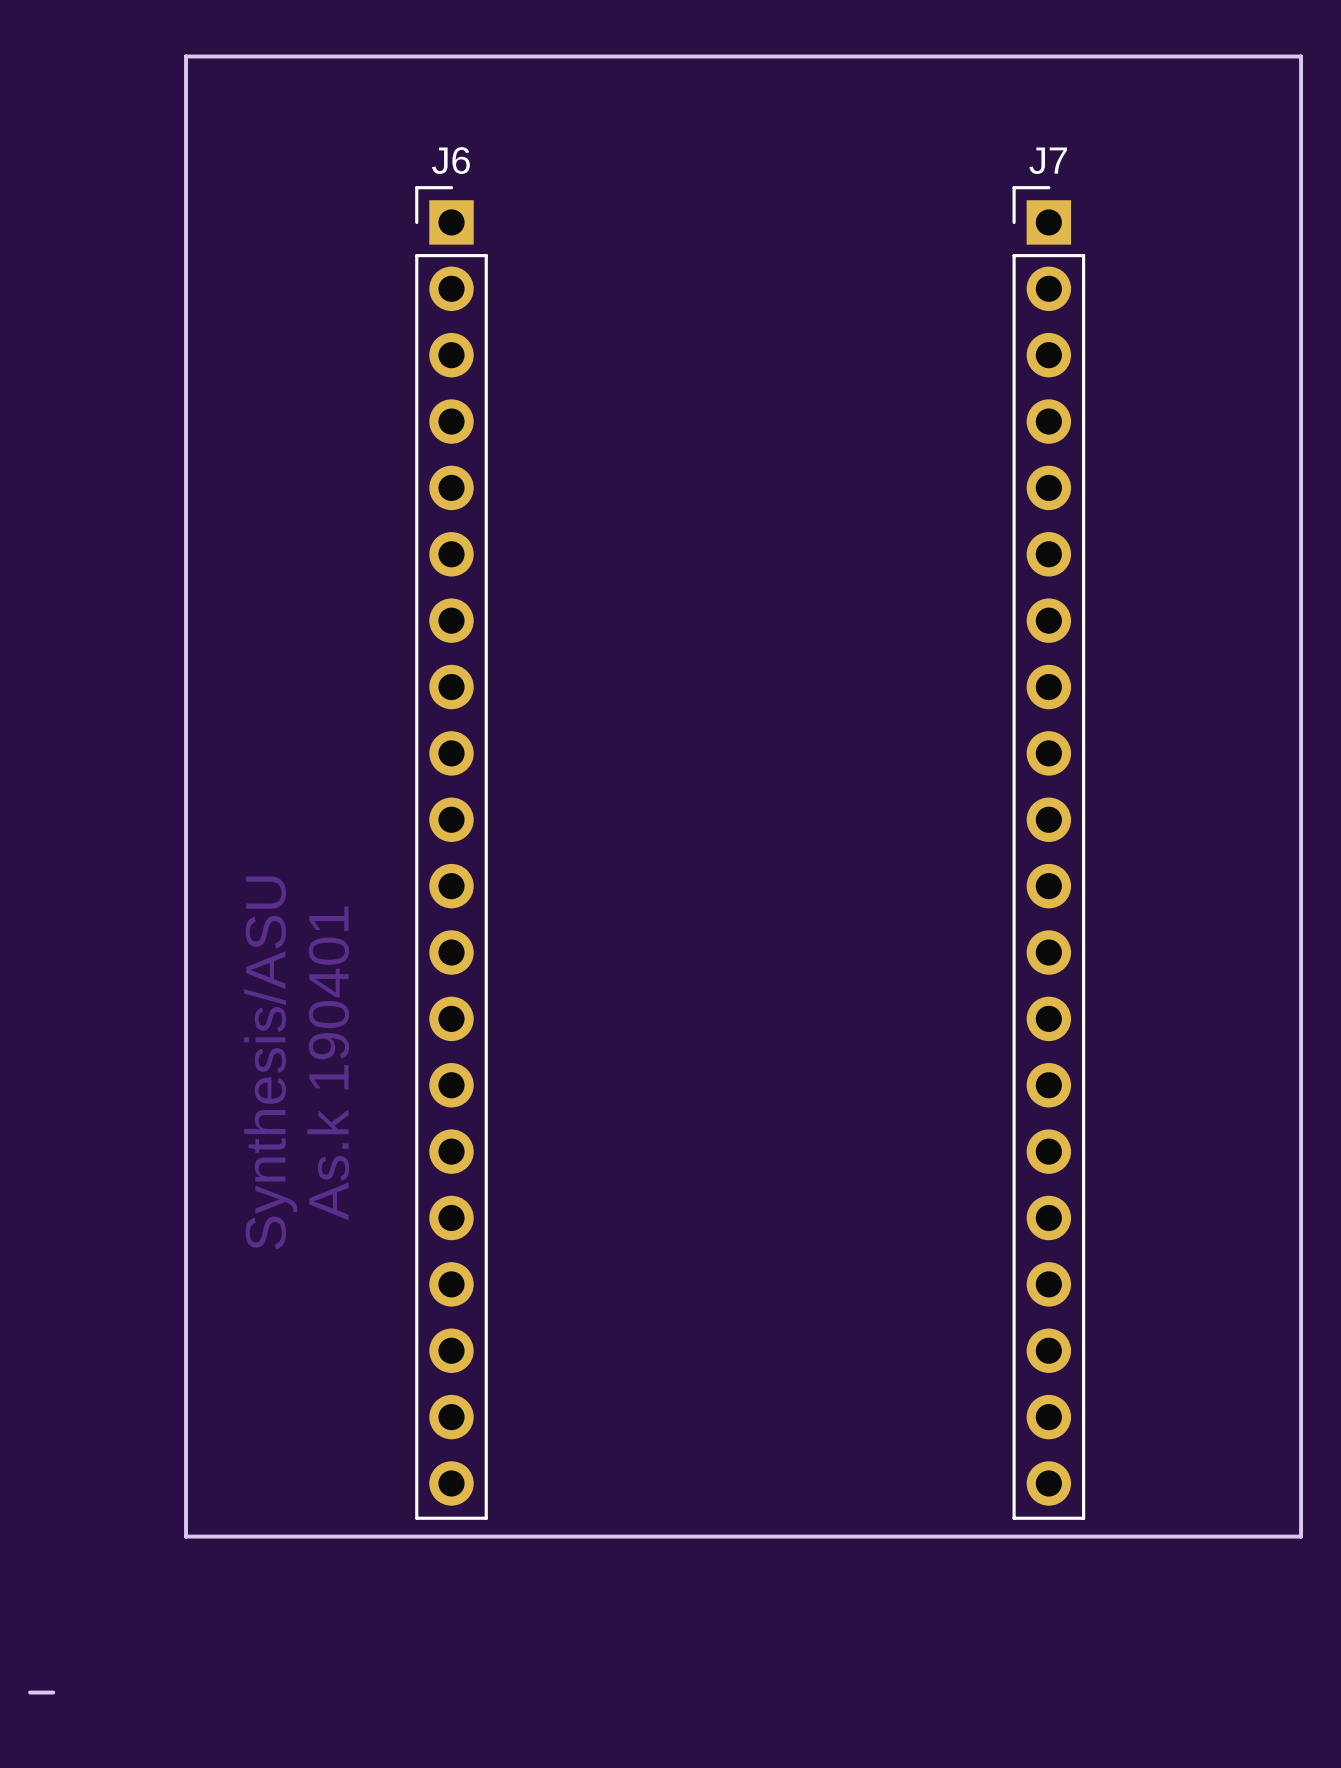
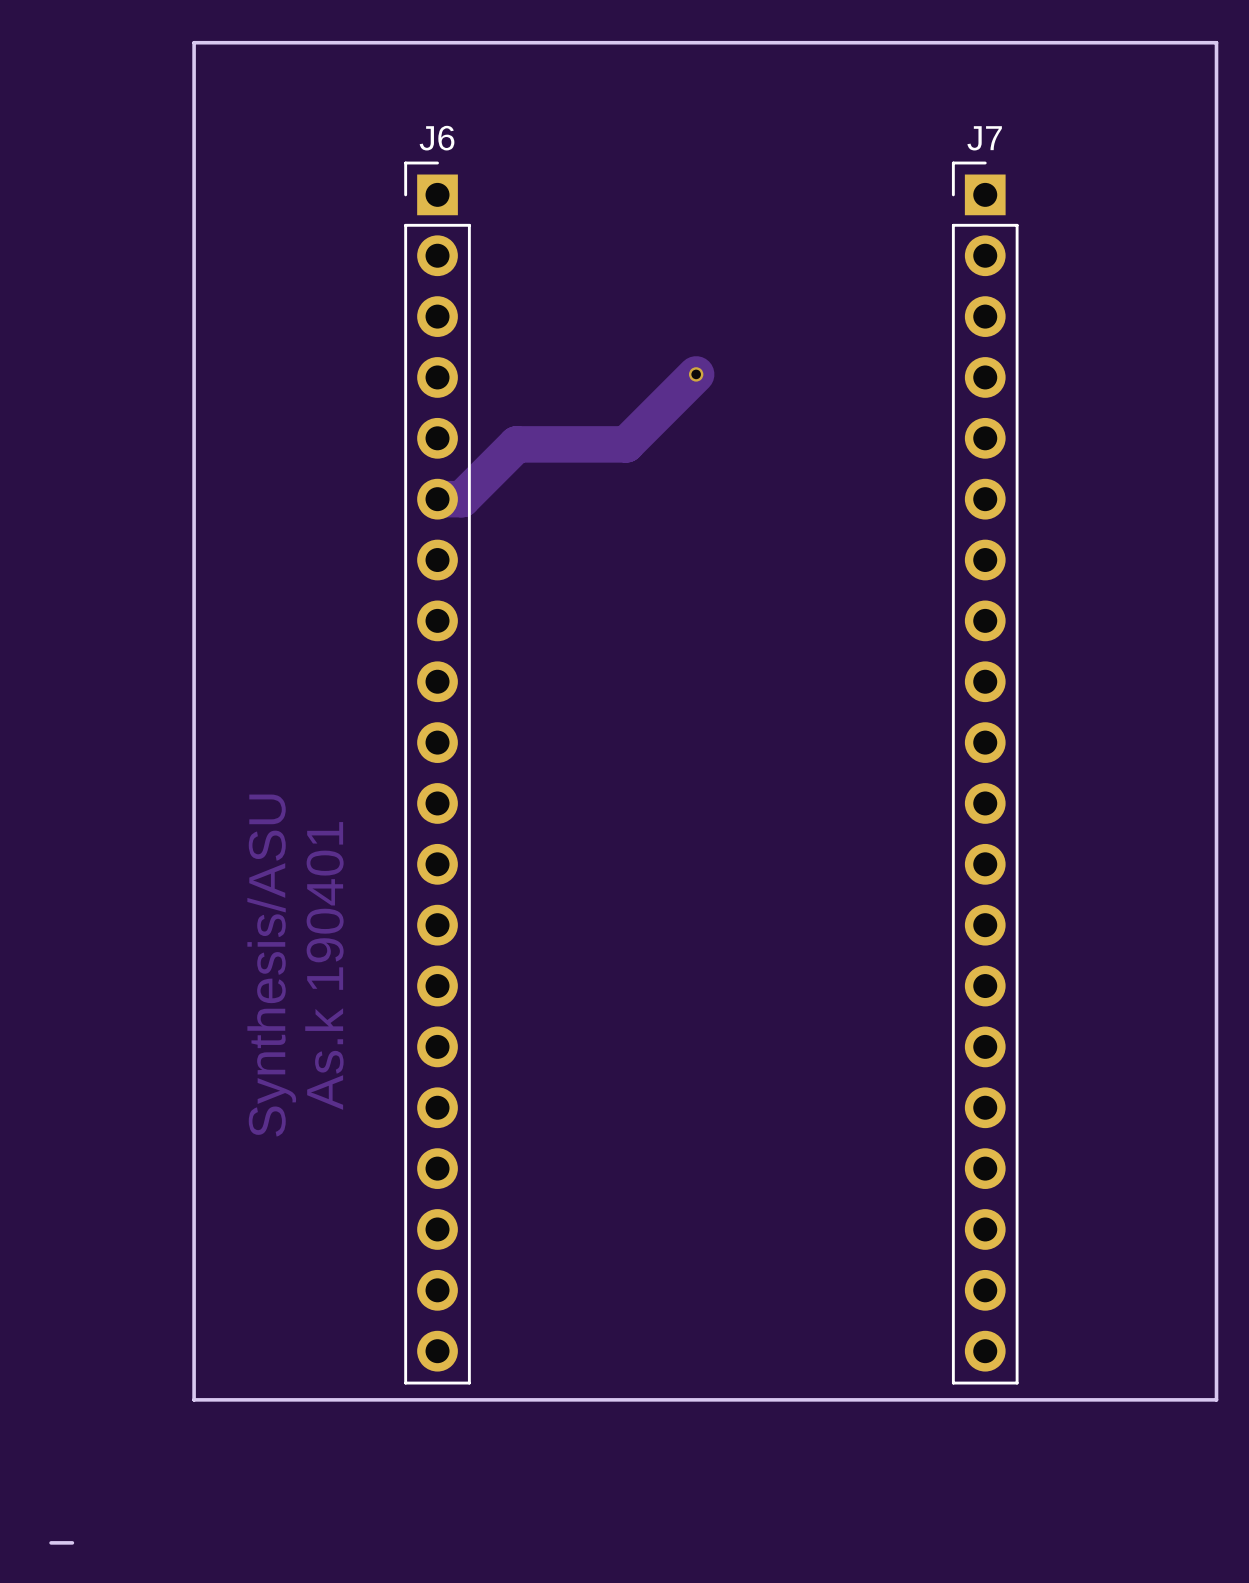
track: none -> (696, 374) (626, 444) (516, 444) (461, 499) (437, 499)
via: none -> (696, 374)

